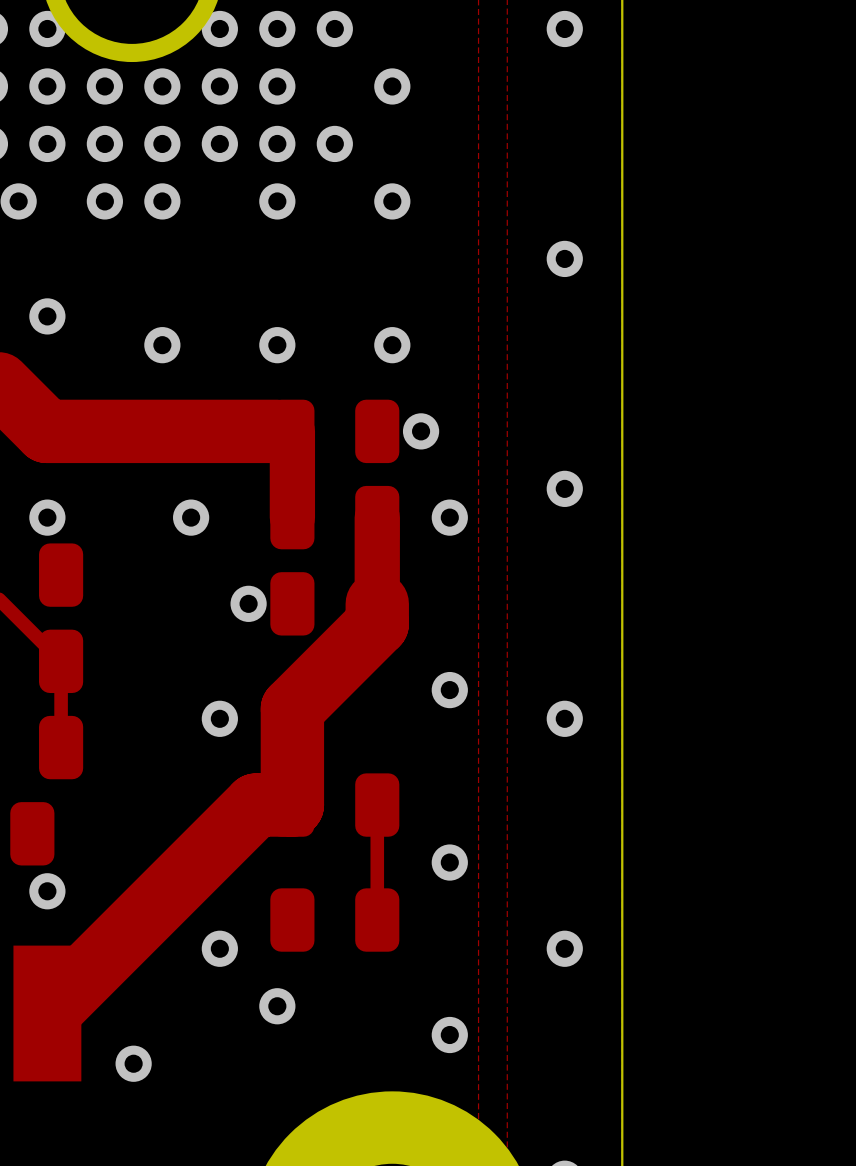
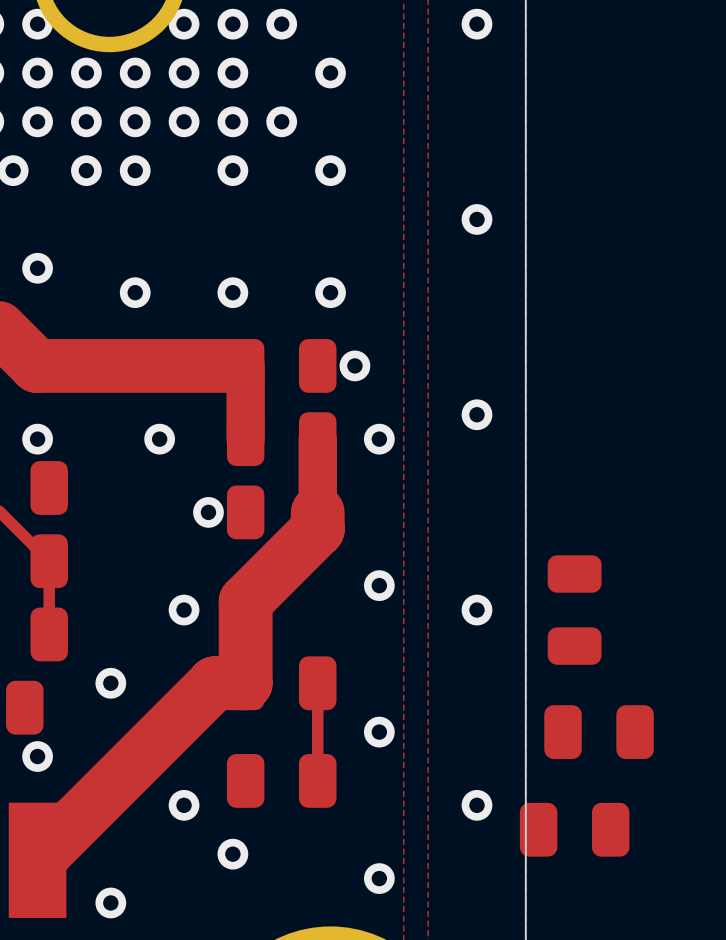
part: none -> (574, 610)
via: none -> (110, 683)
part: none -> (599, 732)
part: none -> (574, 829)

